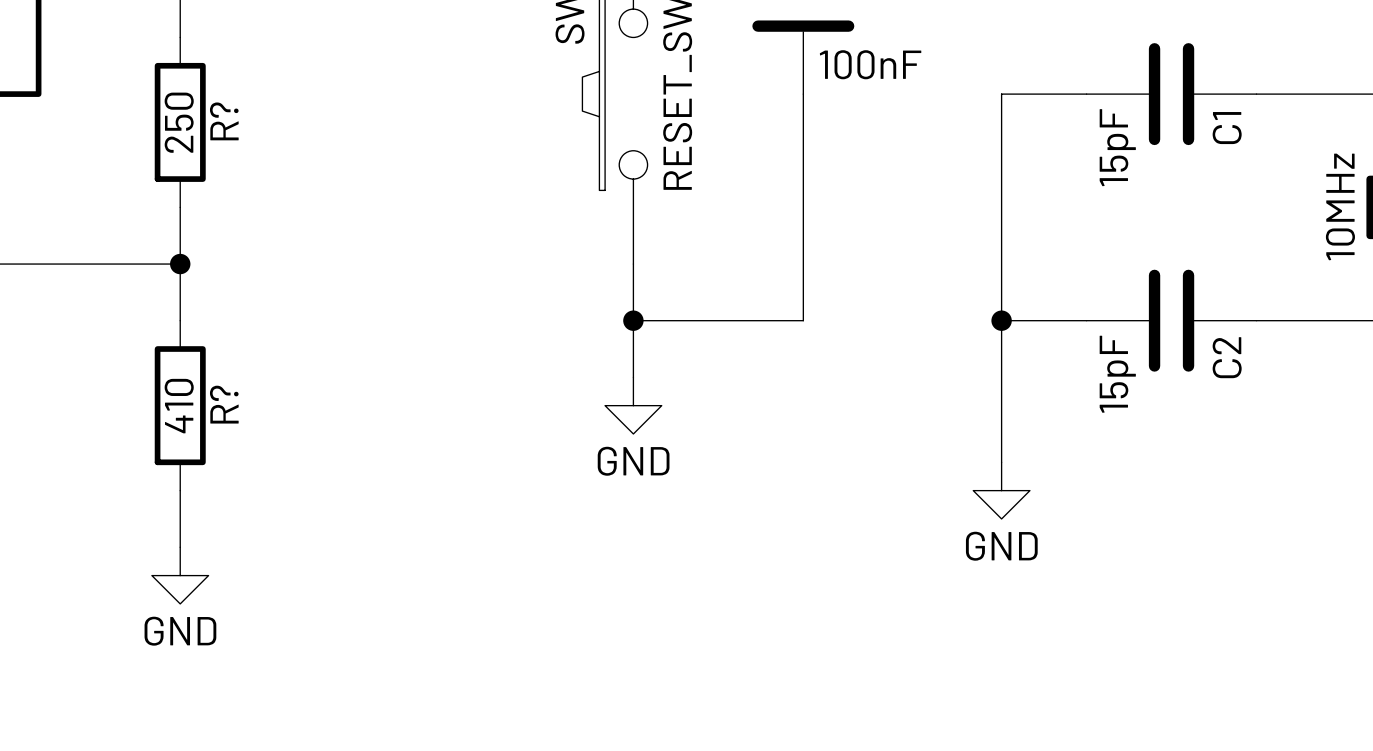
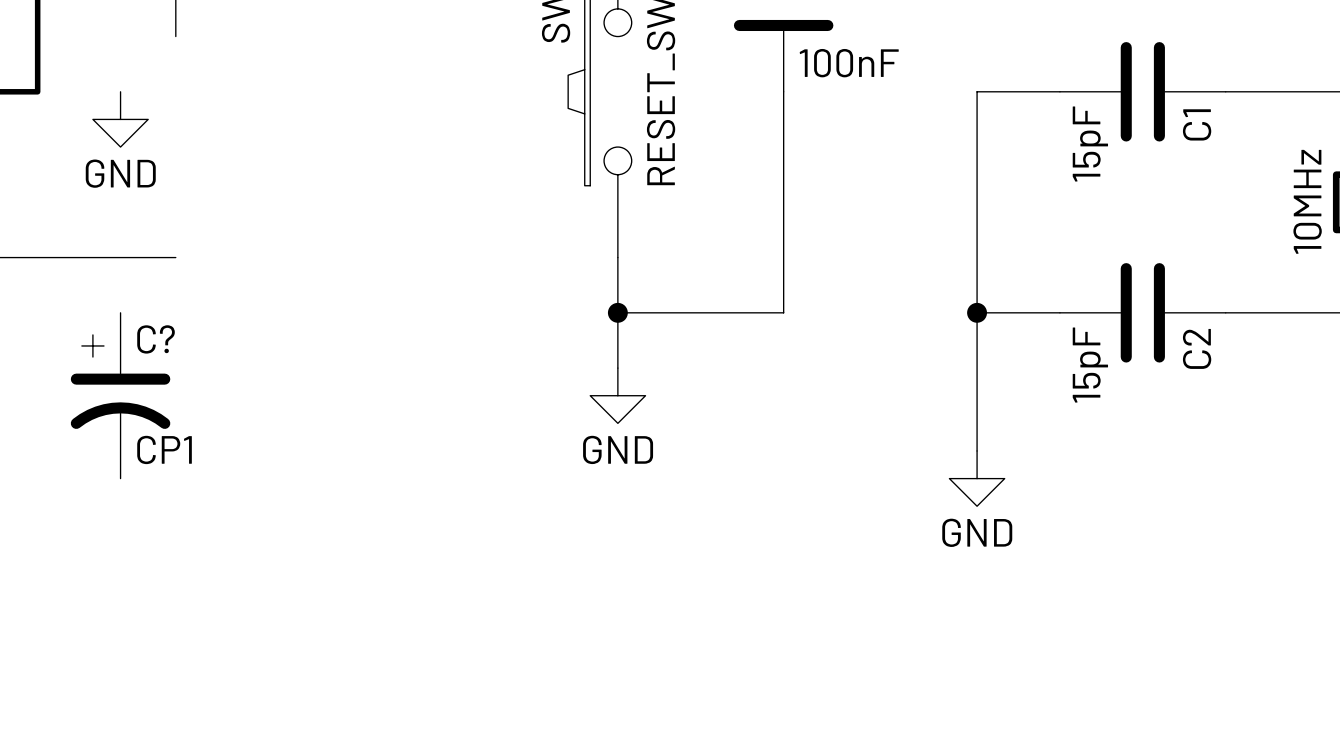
R?: 250 (180, 122) -> none
wire: (180, 207) (180, 320) -> none
junction: (180, 264) -> none
C?: none -> CP1 (120, 395)
R?: 410 (180, 405) -> none
wire: (180, 490) (180, 547) -> none
power symbol position: GND (180, 575) -> GND (120, 119)

